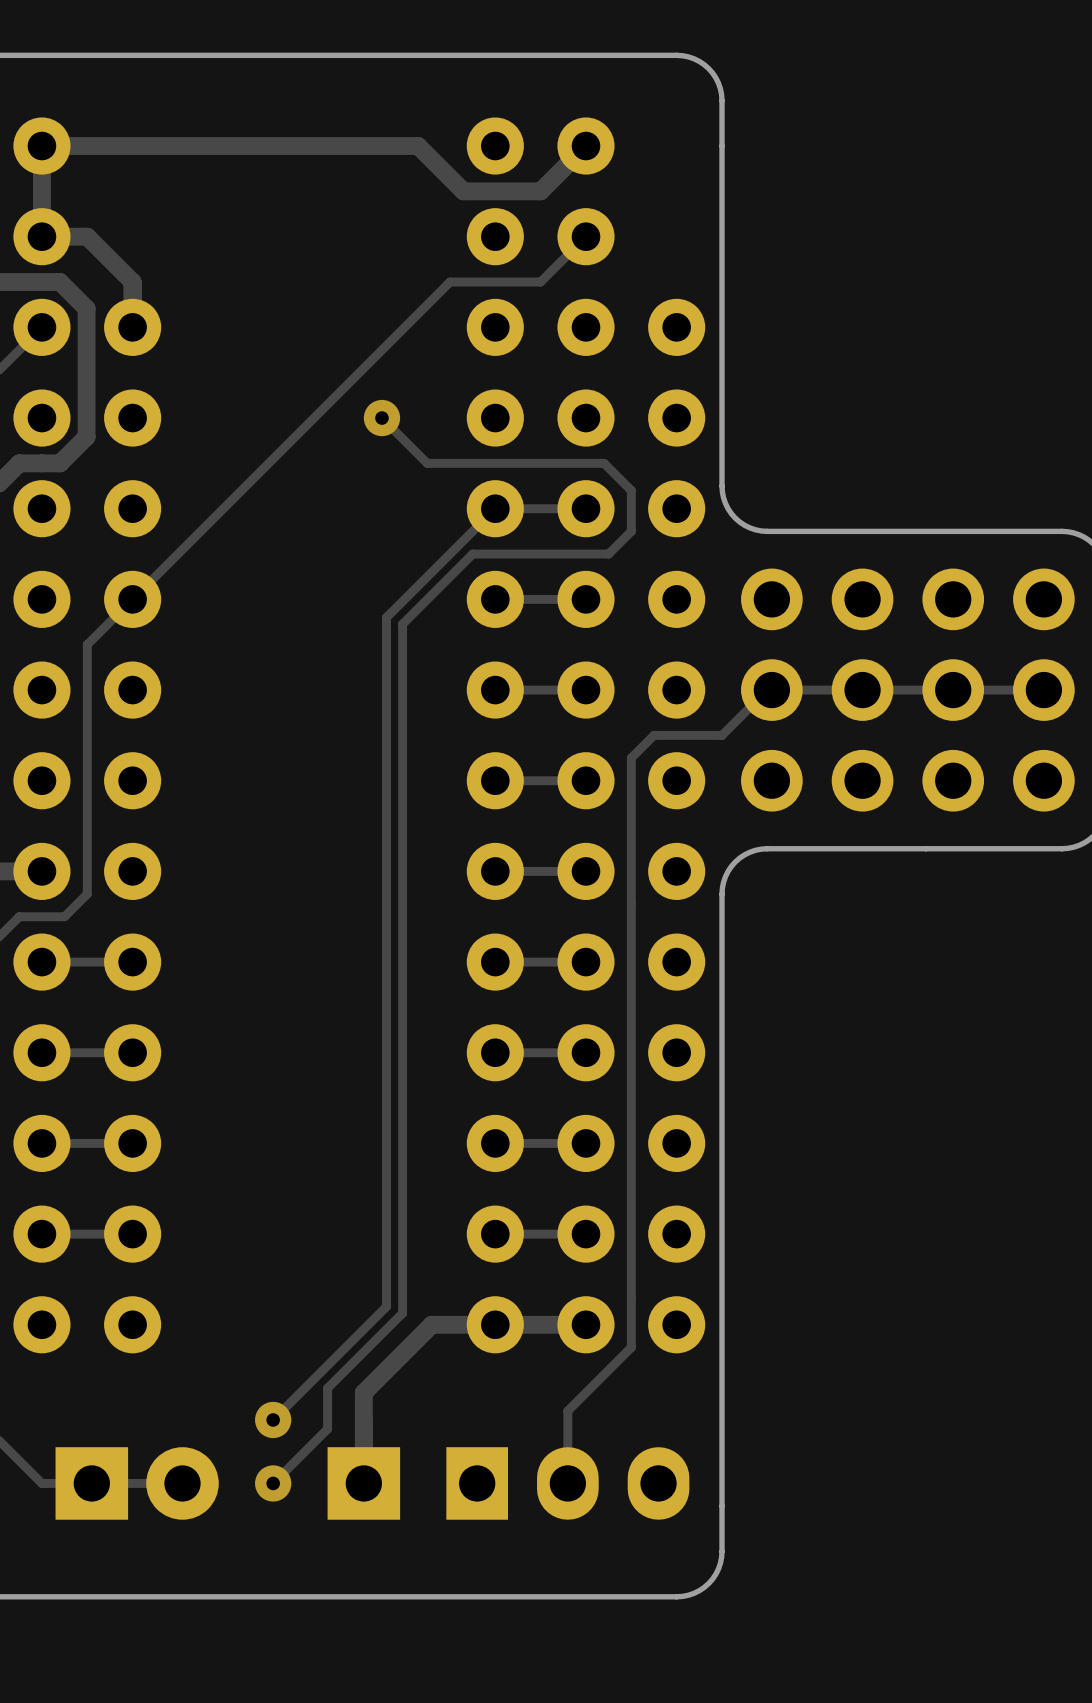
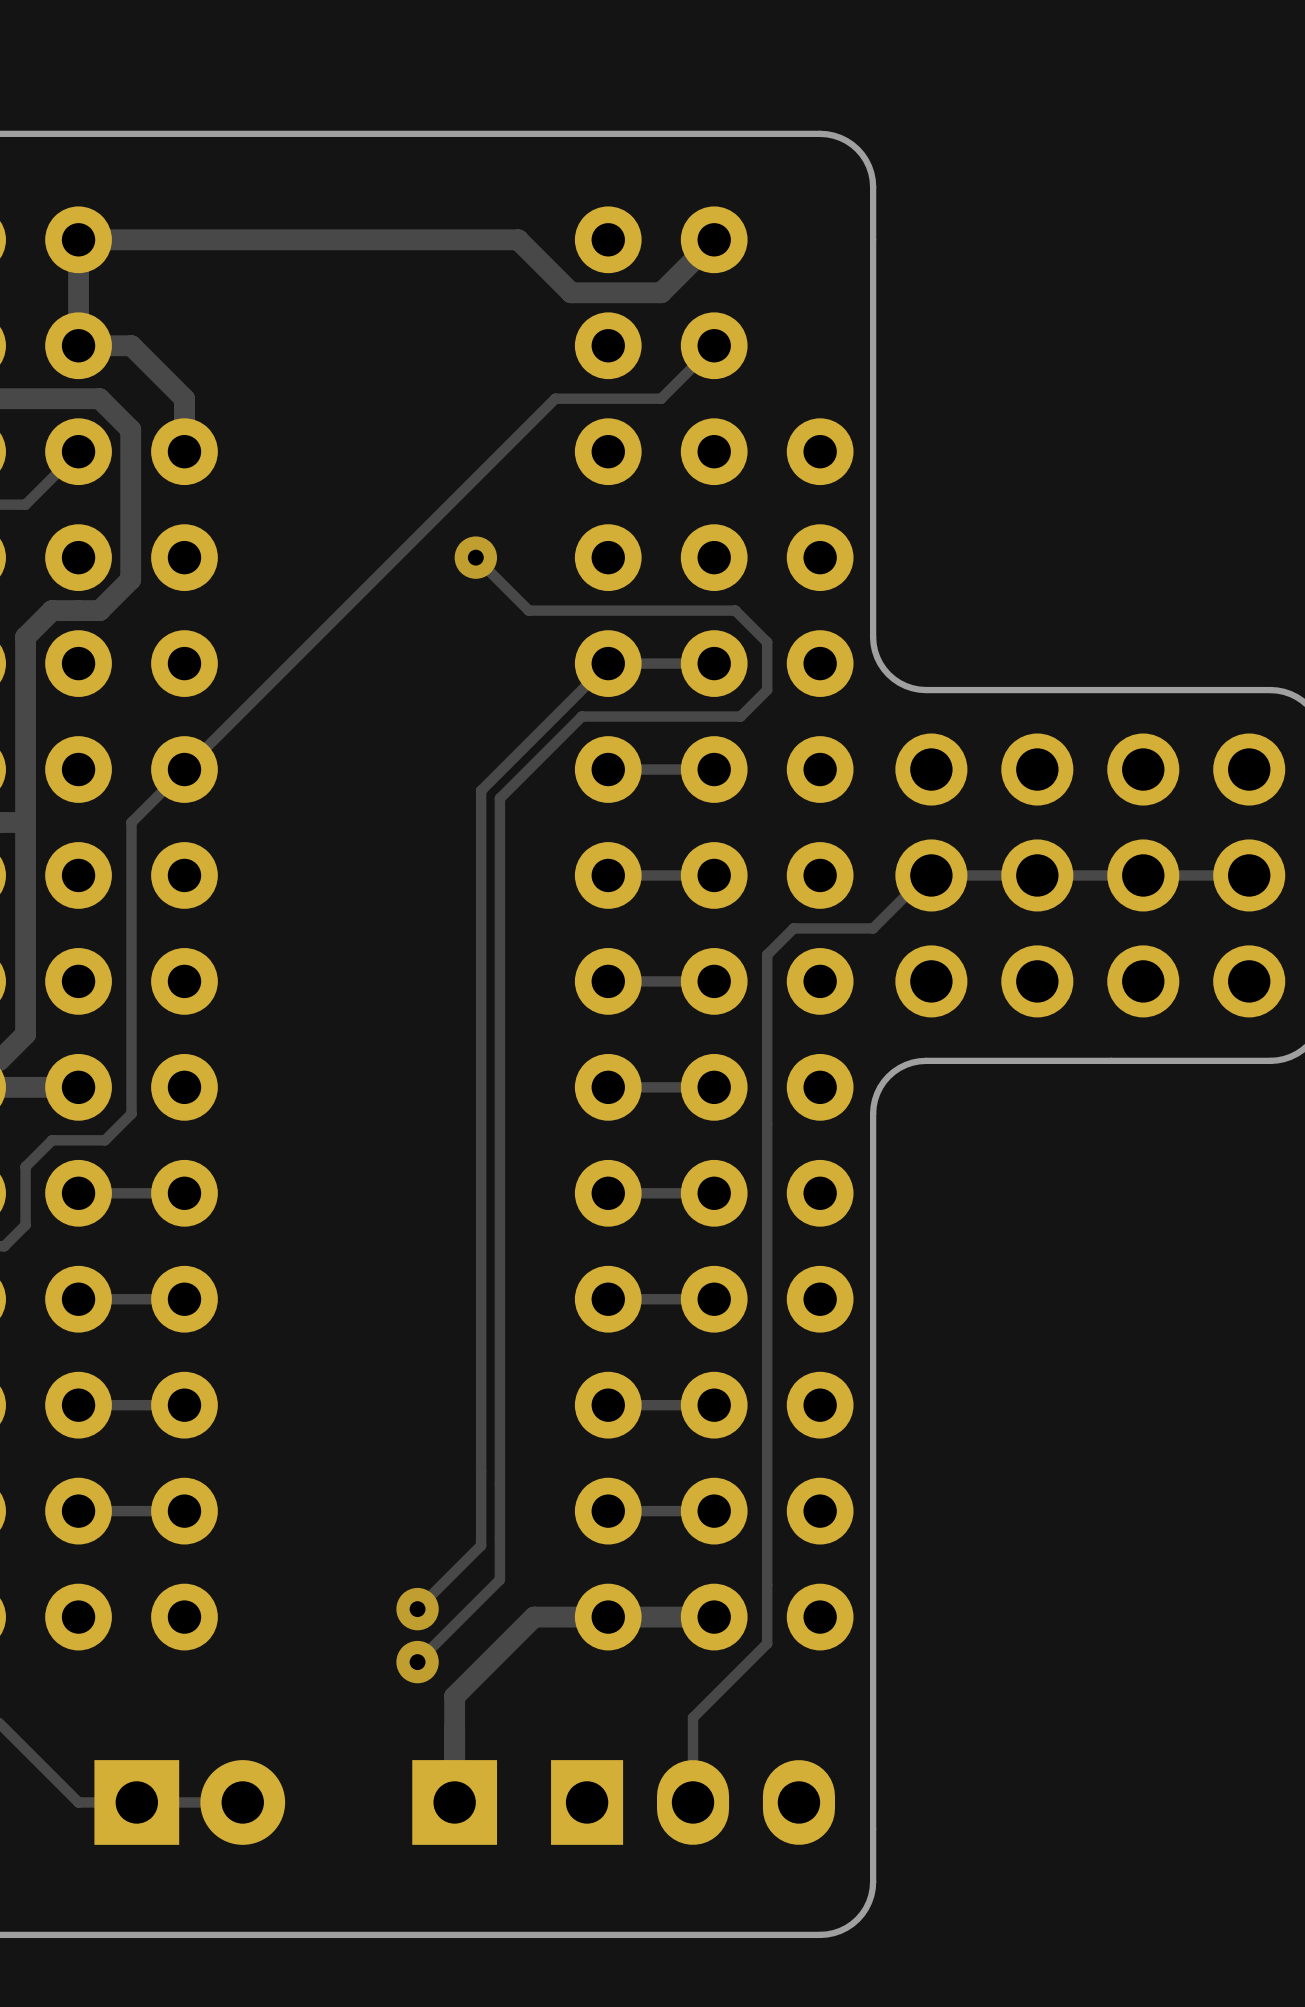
track: (386, 1263) (386, 1306) (273, 1419) -> (481, 1545) (417, 1609)
track: (402, 1292) (402, 1313) (327, 1388) (327, 1429) (273, 1483) -> (499, 1579) (417, 1662)
via: none -> (417, 1609)
via: none -> (417, 1662)
via: (273, 1419) -> none
via: (273, 1483) -> none

